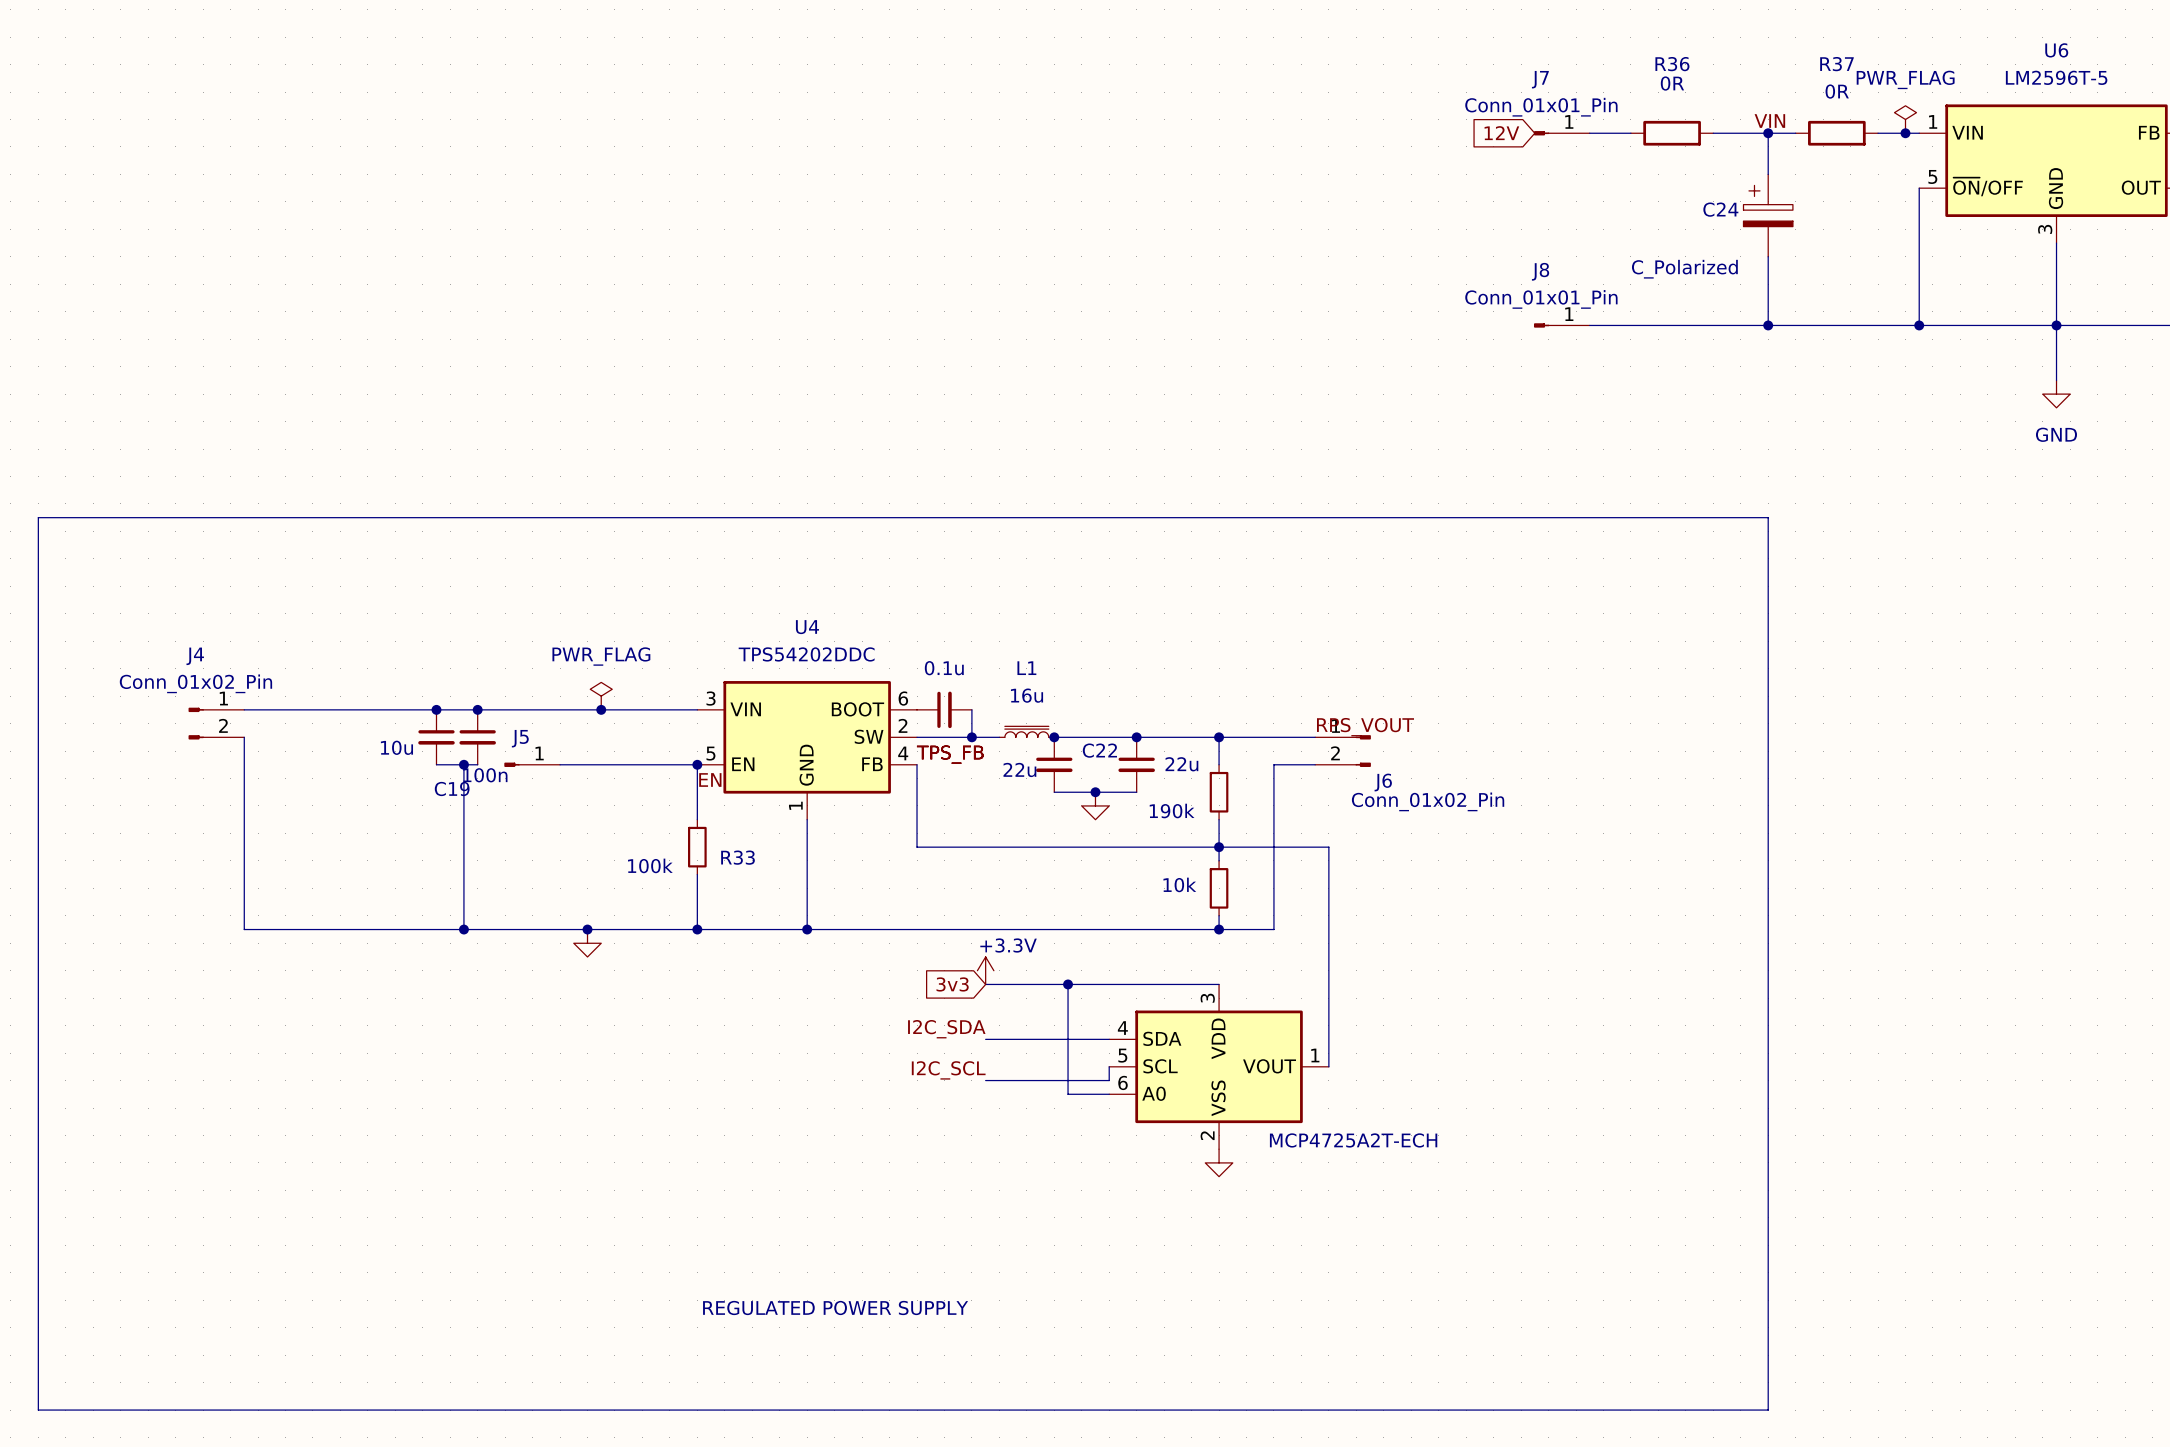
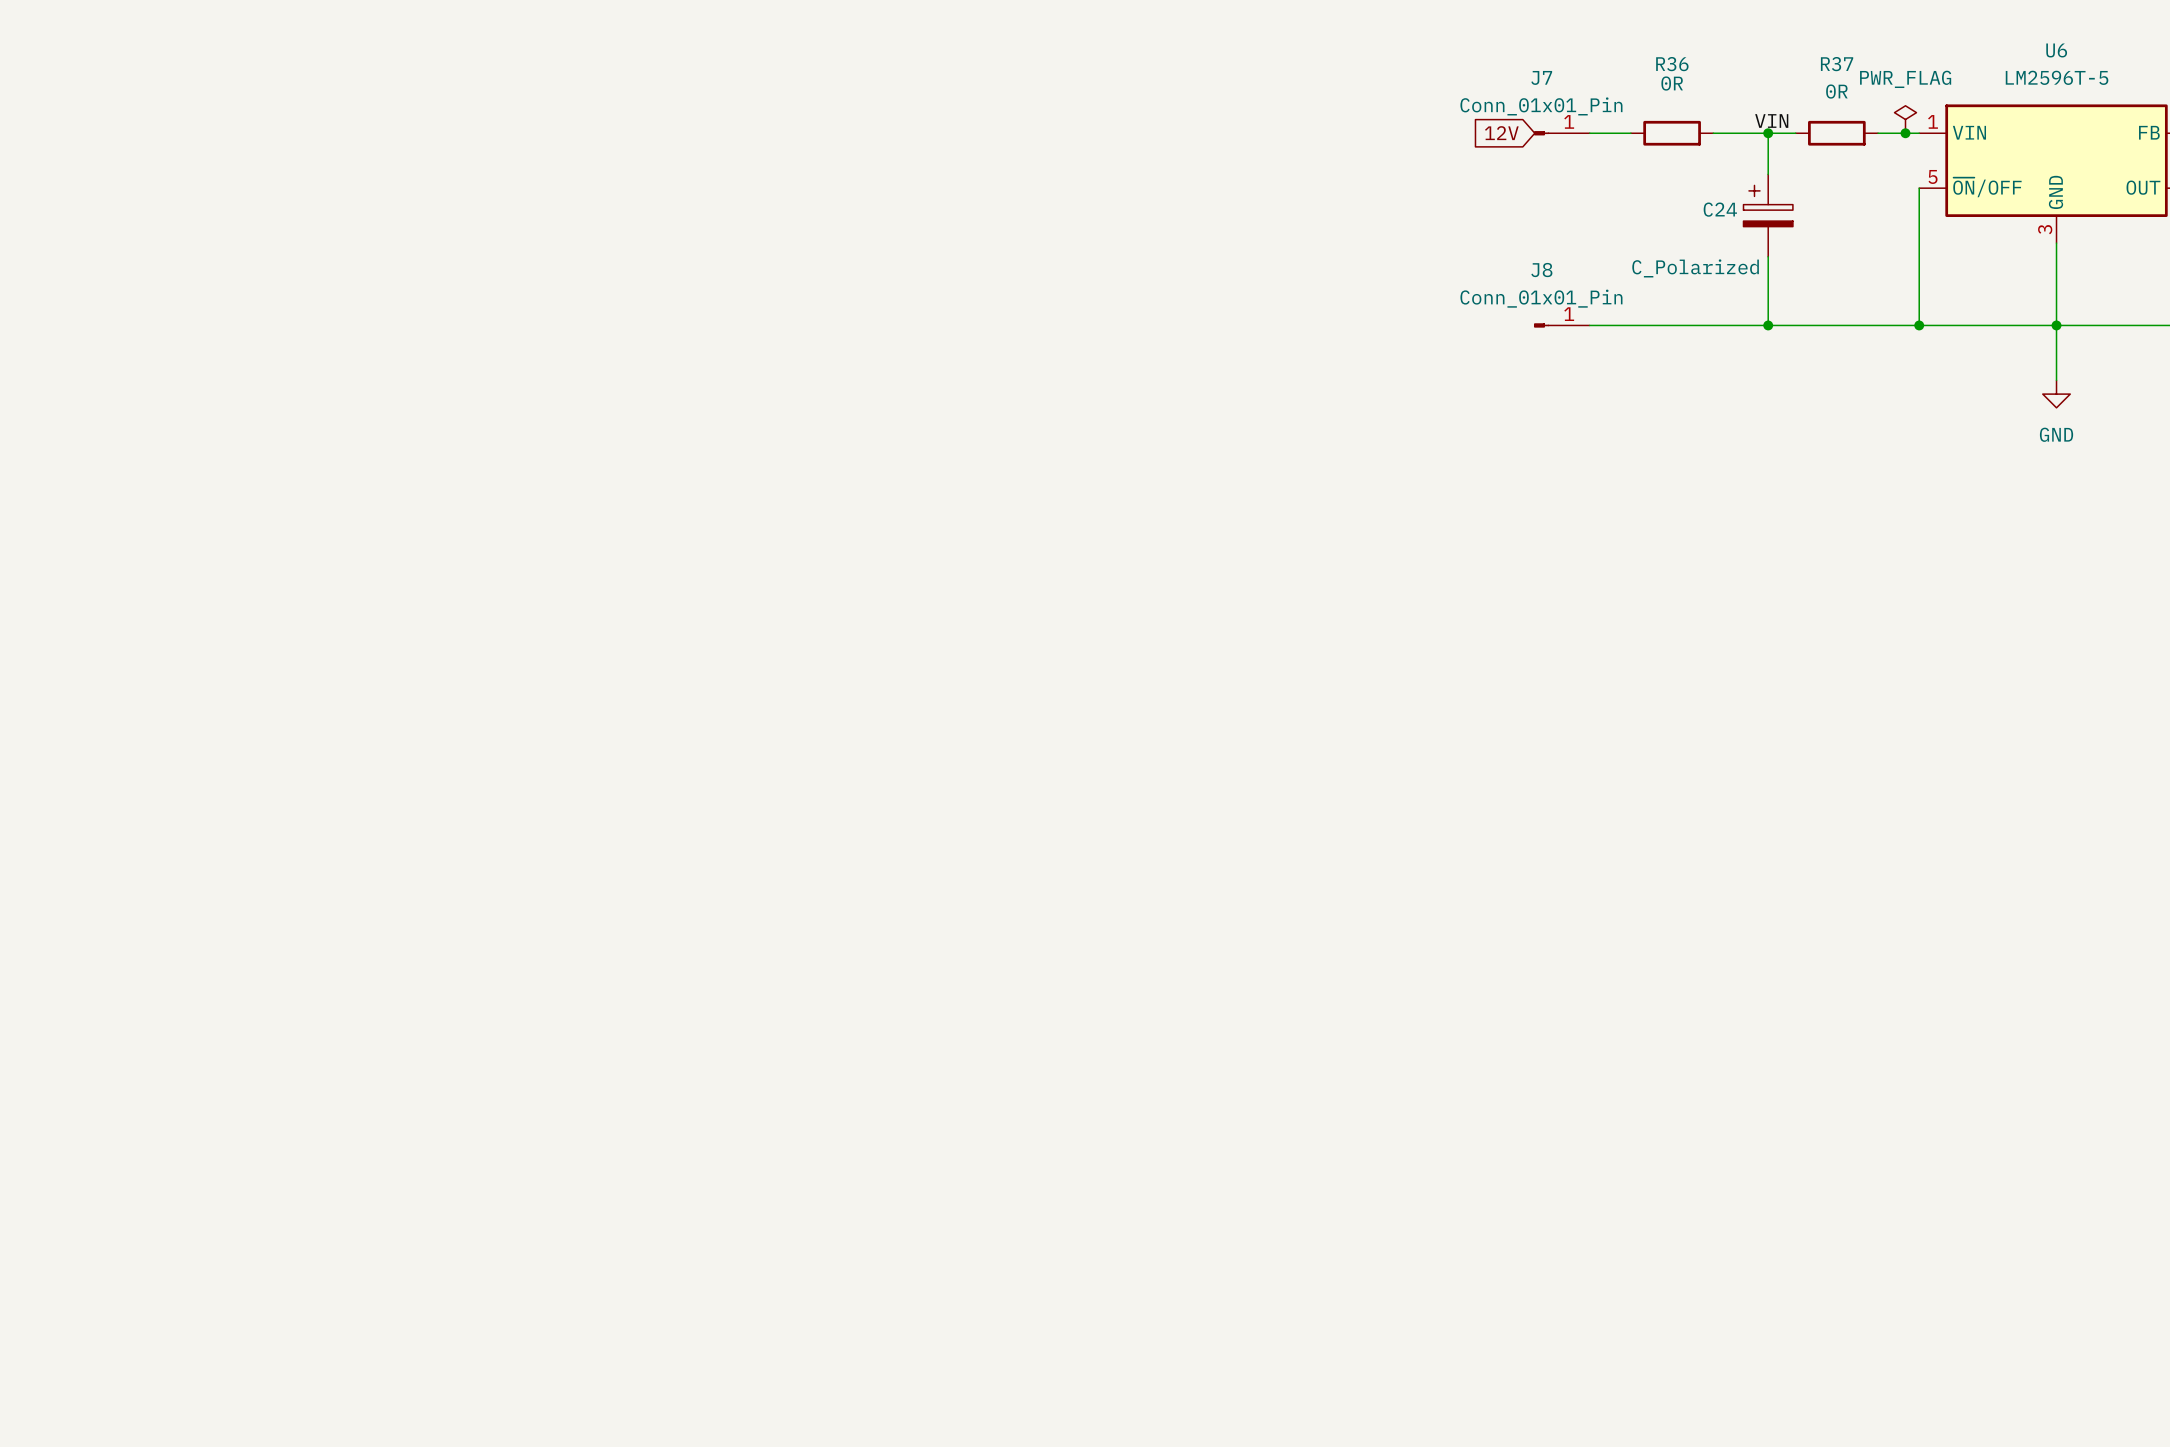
line: (38, 517) (1768, 517) (1768, 1410) (38, 1410) (38, 517) -> none
power symbol: PWR_FLAG (601, 696) -> none
wire: (244, 709) (697, 709) -> none
junction: (436, 709) -> none
junction: (477, 709) -> none
junction: (601, 709) -> none
part: 0.1u (944, 709) -> none
wire: (971, 709) (971, 737) -> none
J4: Conn_01x02_Pin (216, 723) -> none
label: RPS_VOUT (1365, 727) -> none
L1: 16u (1026, 731) -> none
wire: (244, 737) (244, 929) (1273, 929) (1273, 764) (1315, 764) -> none
C19: 10u (436, 737) -> none
part: 100n (477, 737) -> none
wire: (917, 737) (999, 737) -> none
junction: (971, 737) -> none
wire: (1054, 737) (1315, 737) -> none
junction: (1054, 737) -> none
junction: (1136, 737) -> none
wire: (1219, 737) (1219, 764) -> none
junction: (1219, 737) -> none
U4: TPS54202DDC (807, 750) -> none
J6: Conn_01x02_Pin (1343, 751) -> none
label: TPS_FB (950, 754) -> none
wire: (436, 764) (477, 764) -> none
wire: (463, 764) (463, 929) -> none
junction: (463, 764) -> none
J5: (532, 764) -> none
wire: (560, 764) (697, 764) (697, 819) -> none
junction: (697, 764) -> none
wire: (917, 764) (917, 847) (1328, 847) (1328, 1066) -> none
C22: 22u (1054, 764) -> none
part: 22u (1136, 764) -> none
label: EN (710, 779) -> none
wire: (1054, 792) (1136, 792) -> none
junction: (1095, 792) -> none
part: 190k (1219, 792) -> none
power symbol: (1095, 805) -> none
wire: (807, 819) (807, 929) -> none
wire: (1219, 819) (1219, 860) -> none
R33: 100k (697, 847) -> none
junction: (1219, 847) -> none
wire: (697, 874) (697, 929) -> none
part: 10k (1219, 888) -> none
wire: (1219, 915) (1219, 929) -> none
junction: (463, 929) -> none
junction: (587, 929) -> none
junction: (697, 929) -> none
junction: (807, 929) -> none
junction: (1219, 929) -> none
power symbol: (587, 943) -> none
power symbol: +3.3V (985, 970) -> none
global label: 3v3 (952, 984) -> none
wire: (985, 984) (1219, 984) -> none
wire: (1068, 984) (1068, 1094) (1109, 1094) -> none
junction: (1068, 984) -> none
label: I2C_SDA (946, 1029) -> none
wire: (985, 1039) (1109, 1039) -> none
wire: (1109, 1066) (1109, 1080) (985, 1080) -> none
part: MCP4725A2T-ECH (1219, 1066) -> none
label: I2C_SCL (948, 1070) -> none
power symbol: (1219, 1162) -> none
text: REGULATED POWER SUPPLY (835, 1307) -> none

